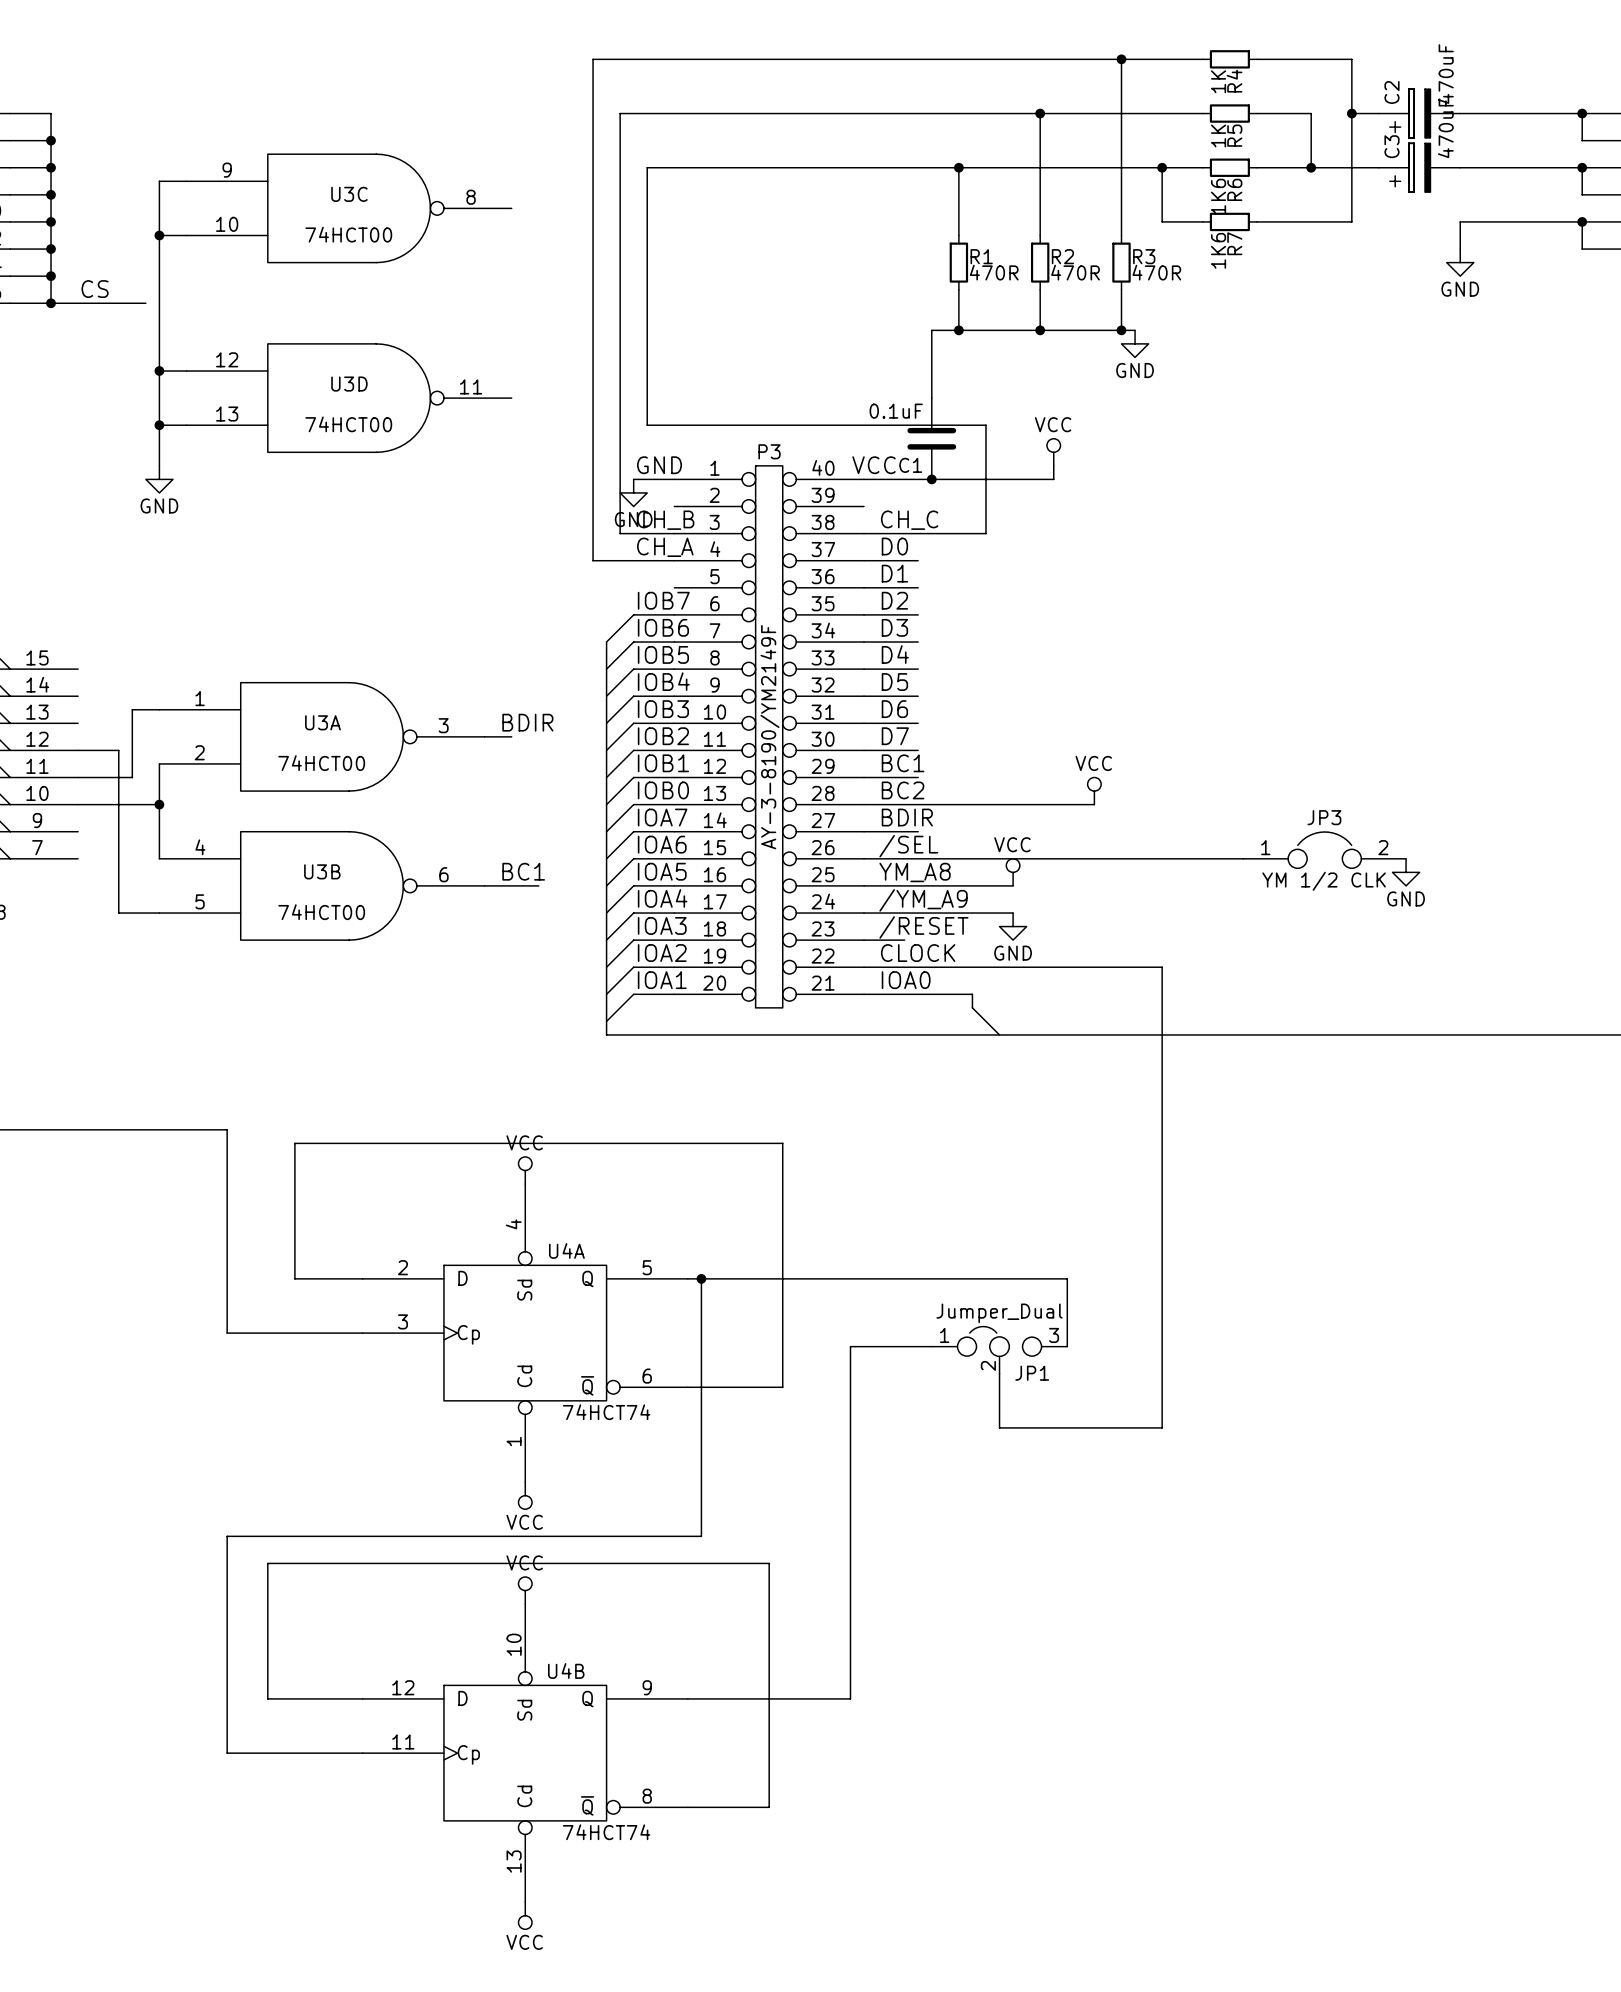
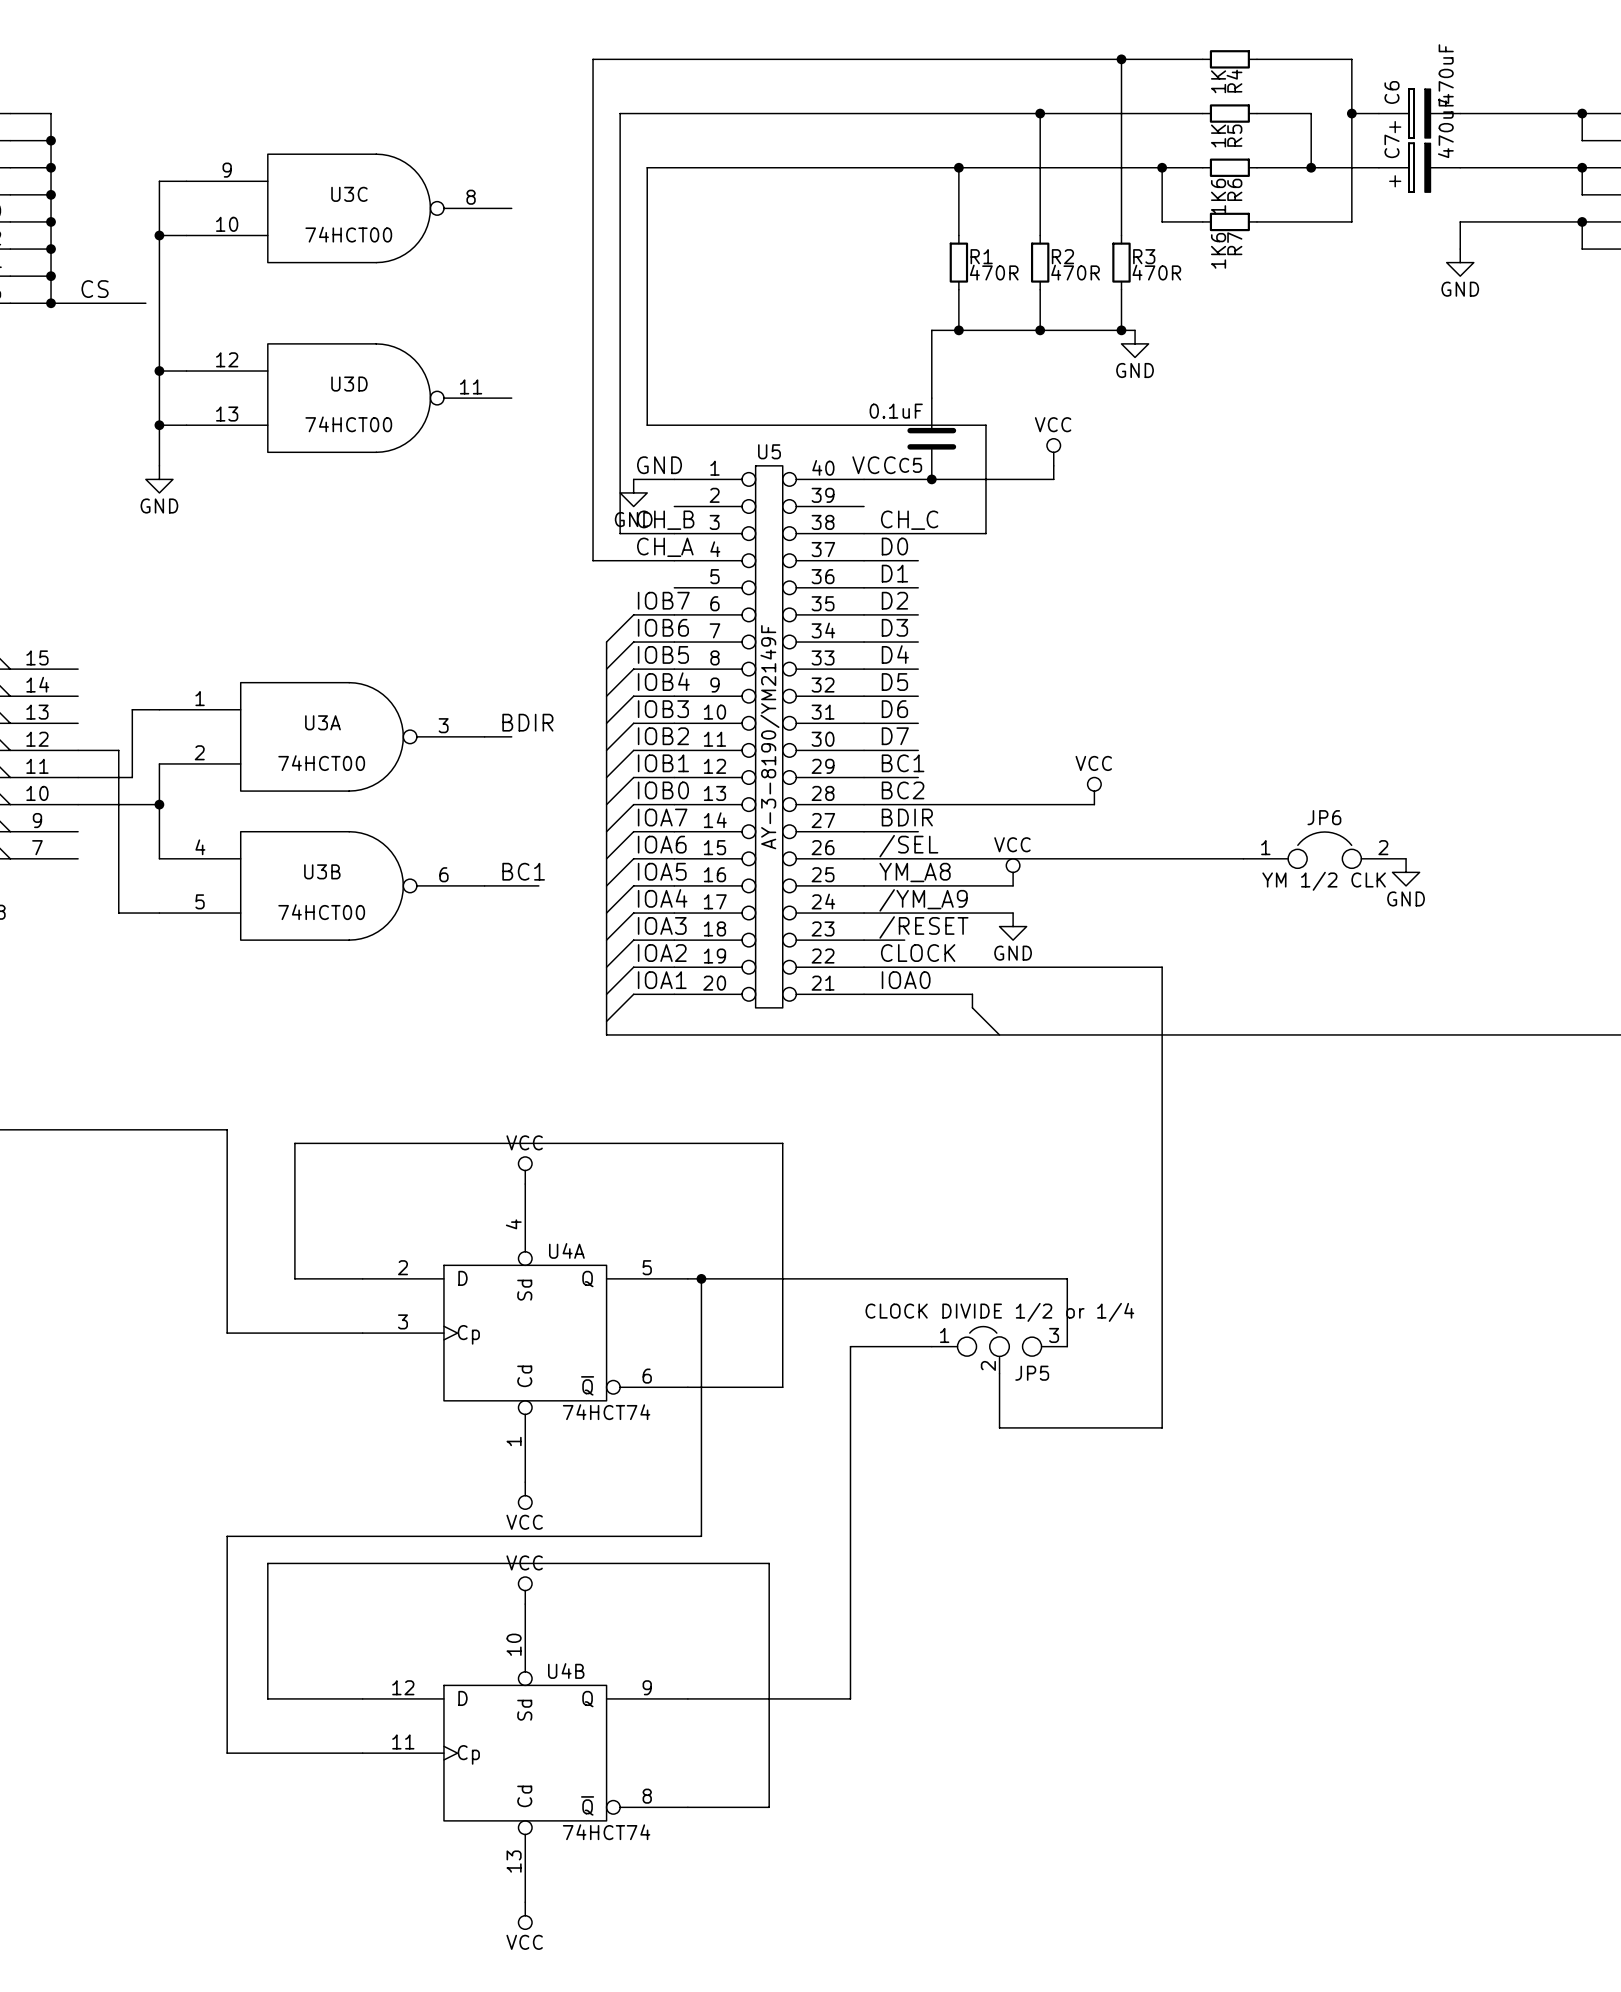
C2 name: C2 (1391, 92) -> C6 (1391, 92)
C3 name: C3 (1391, 146) -> C7 (1391, 146)
P3 name: P3 (769, 451) -> U5 (769, 451)
C1 name: C1 (910, 465) -> C5 (910, 465)
JP3 name: JP3 (1324, 817) -> JP6 (1324, 817)
JP1 value: Jumper_Dual (999, 1313) -> CLOCK DIVIDE 1/2 or 1/4 (999, 1312)
JP1 name: JP1 (1032, 1373) -> JP5 (1032, 1373)

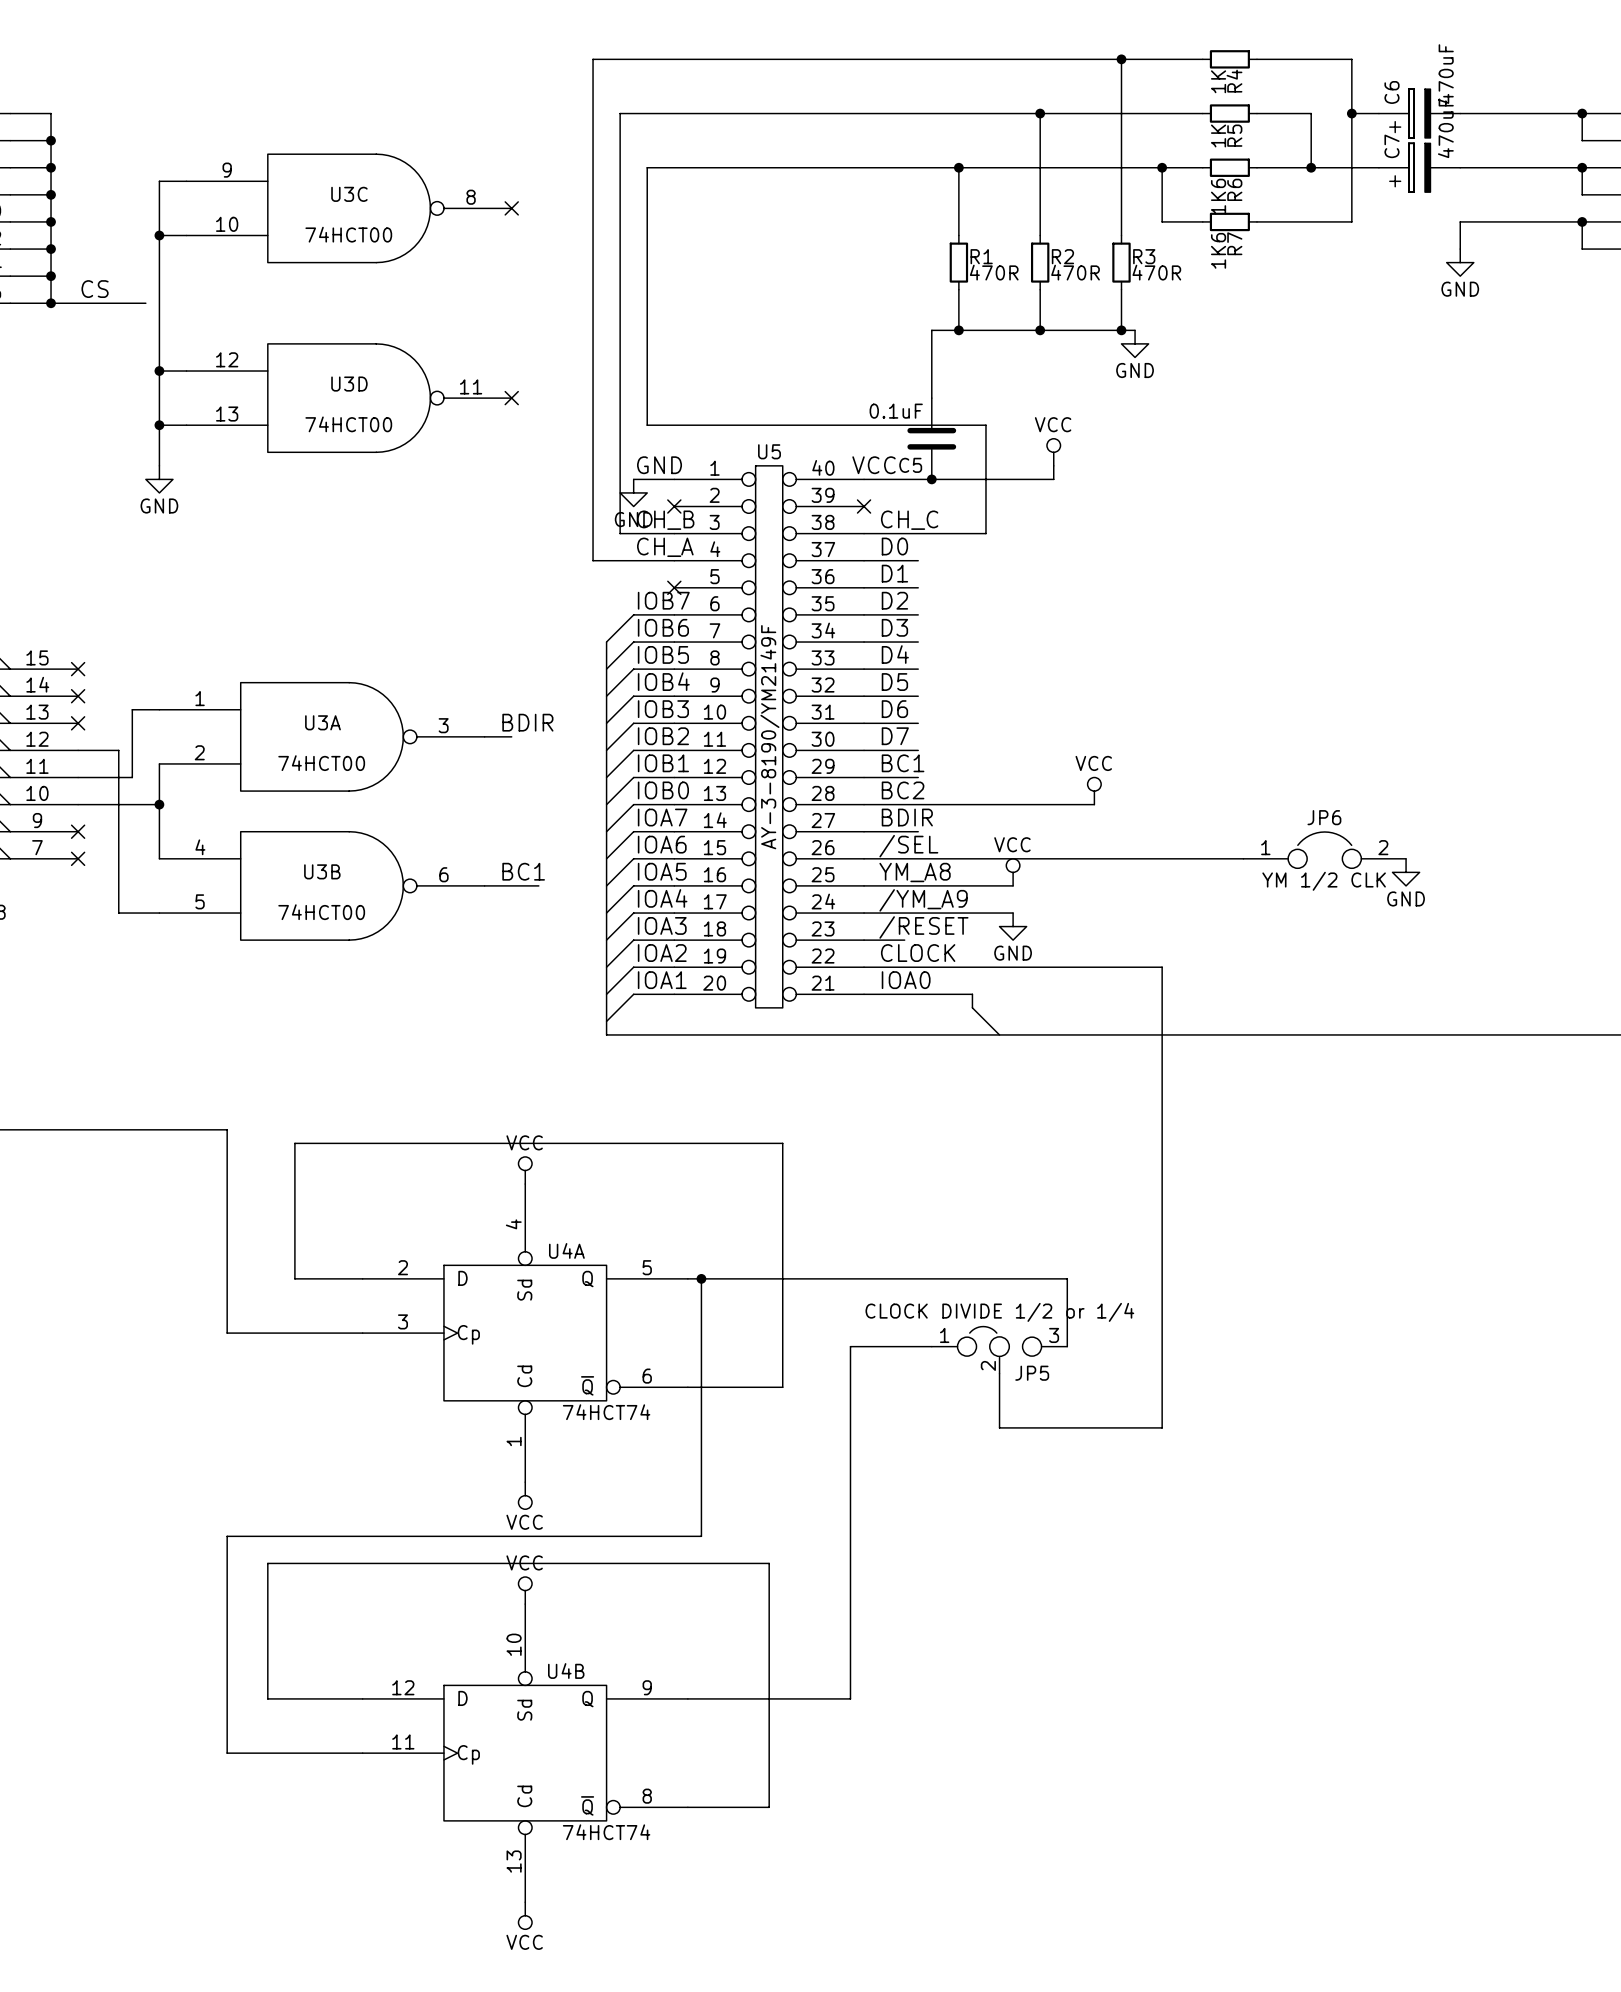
no-connect mark: none -> (511, 208)
no-connect mark: none -> (511, 398)
no-connect mark: none -> (674, 506)
no-connect mark: none -> (864, 506)
no-connect mark: none -> (674, 587)
no-connect mark: none -> (78, 669)
no-connect mark: none -> (78, 696)
no-connect mark: none -> (78, 723)
no-connect mark: none -> (78, 831)
no-connect mark: none -> (78, 858)

